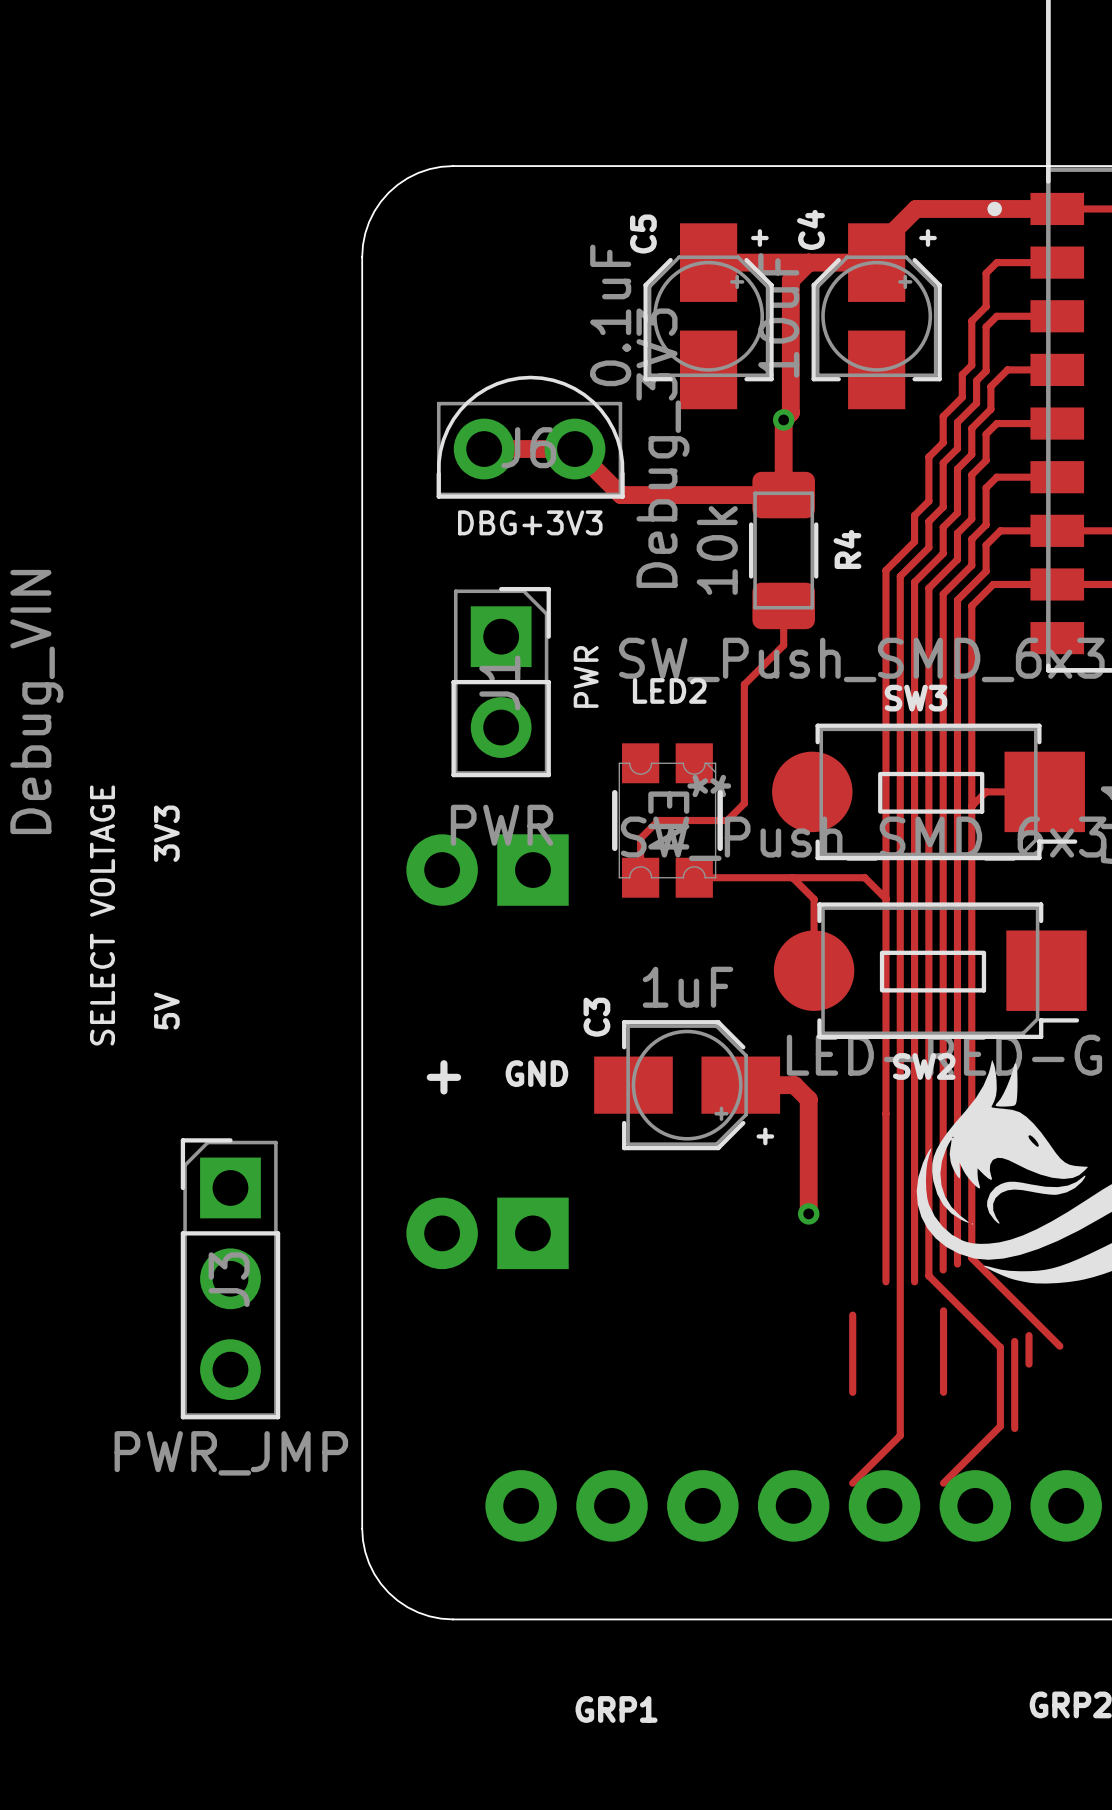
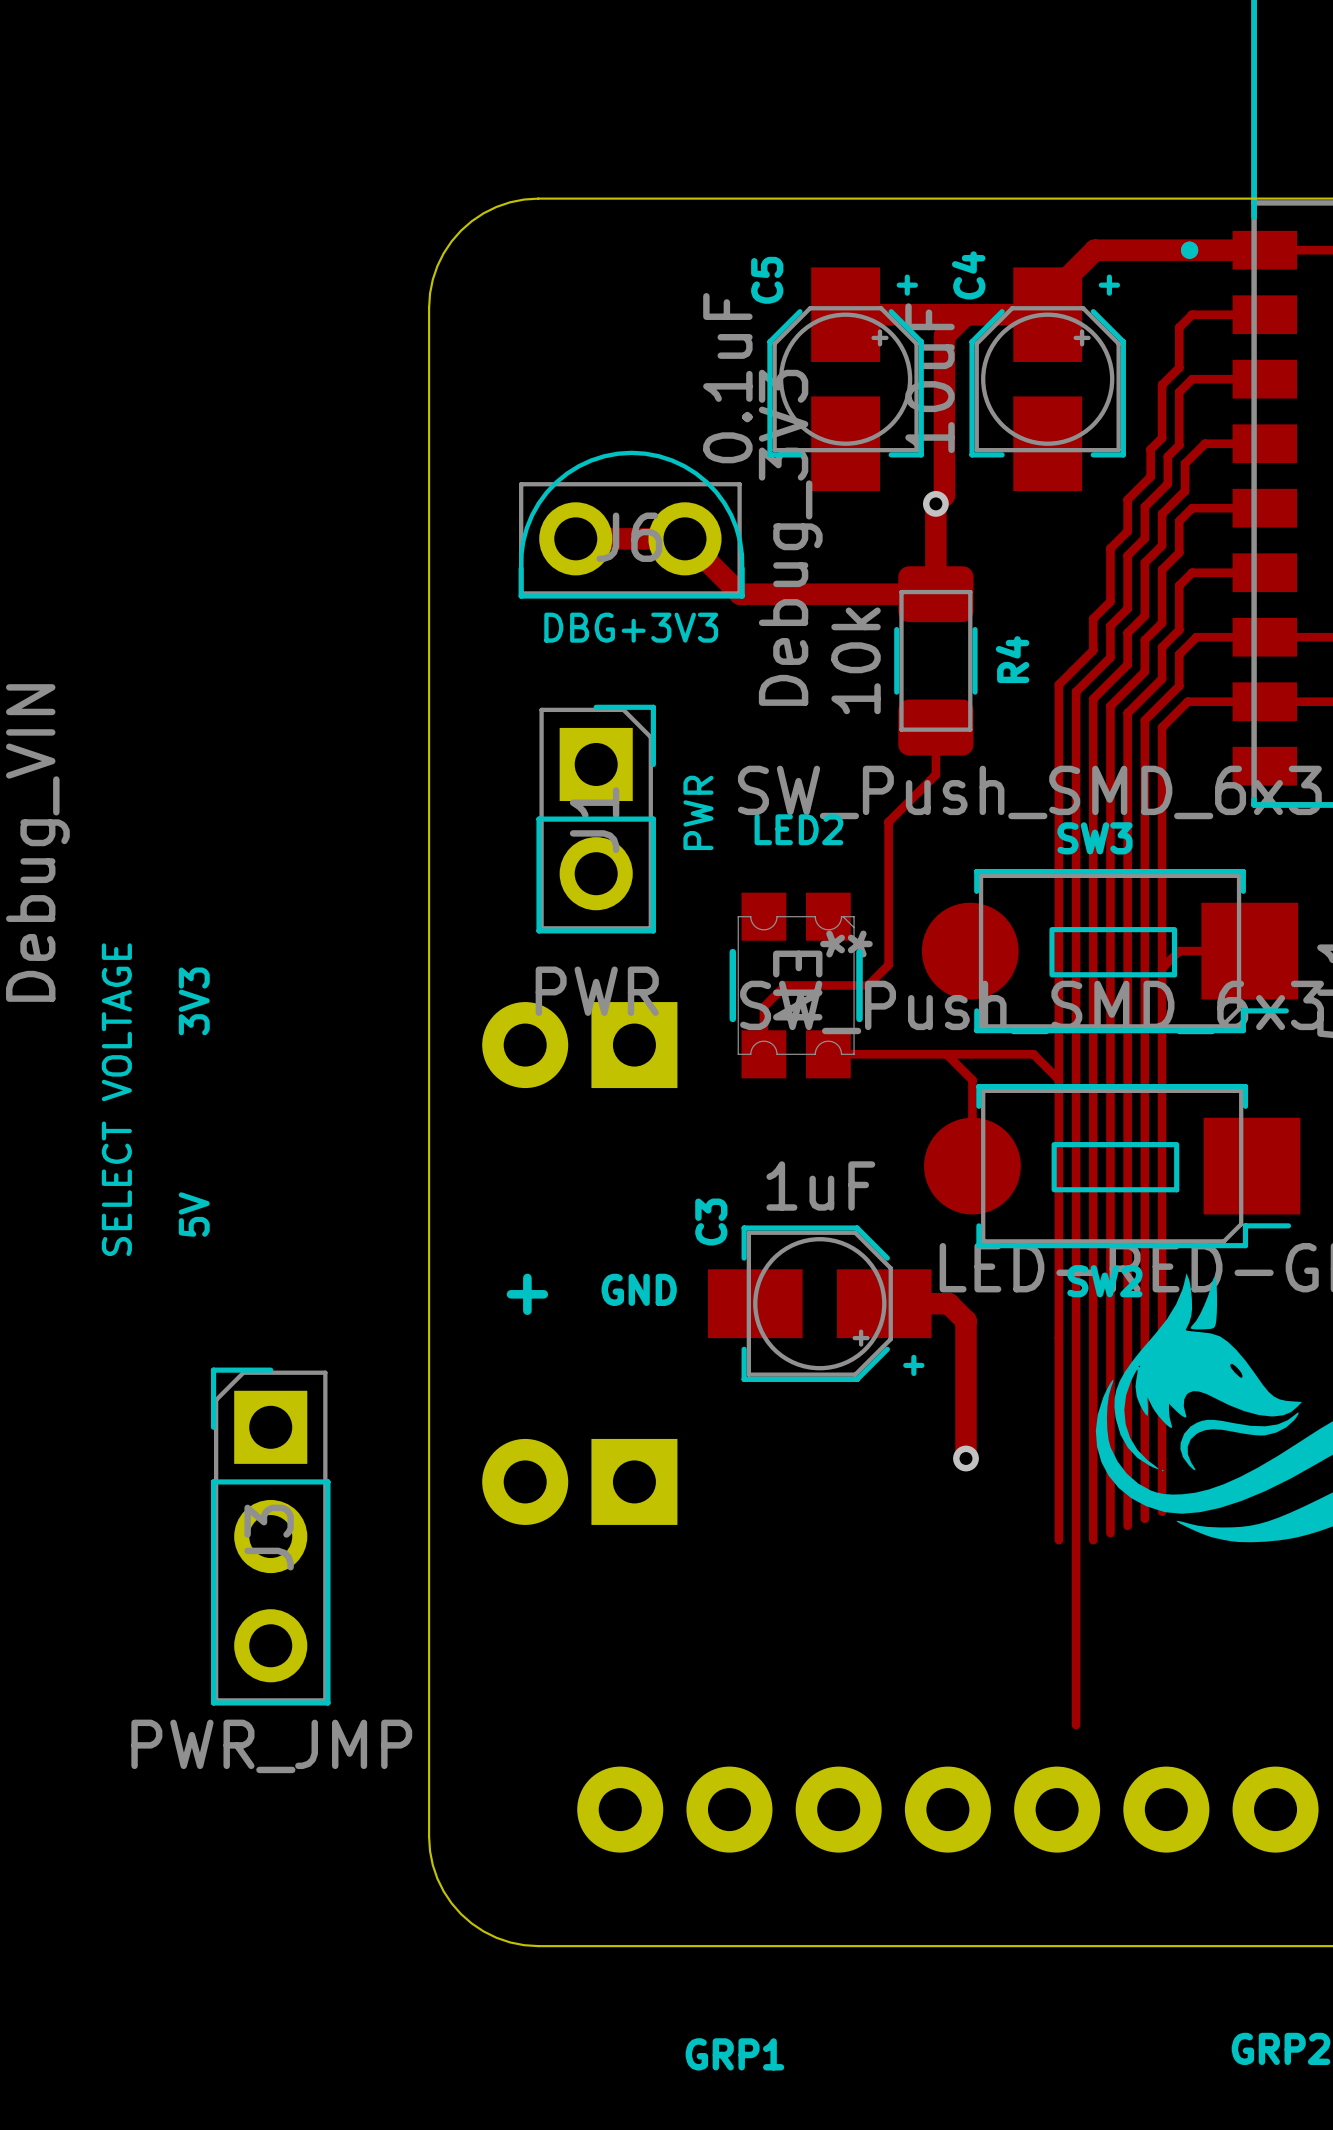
track: (971, 1258) (1059, 1346) -> none
track: (928, 1275) (1000, 1347) (1000, 1426) (943, 1483) -> none
track: (943, 1310) (943, 1392) -> none
track: (852, 1315) (852, 1392) -> none
track: (1029, 1335) (1029, 1364) -> none
track: (1014, 1341) (1014, 1428) -> none
track: (900, 1435) (852, 1483) -> none

